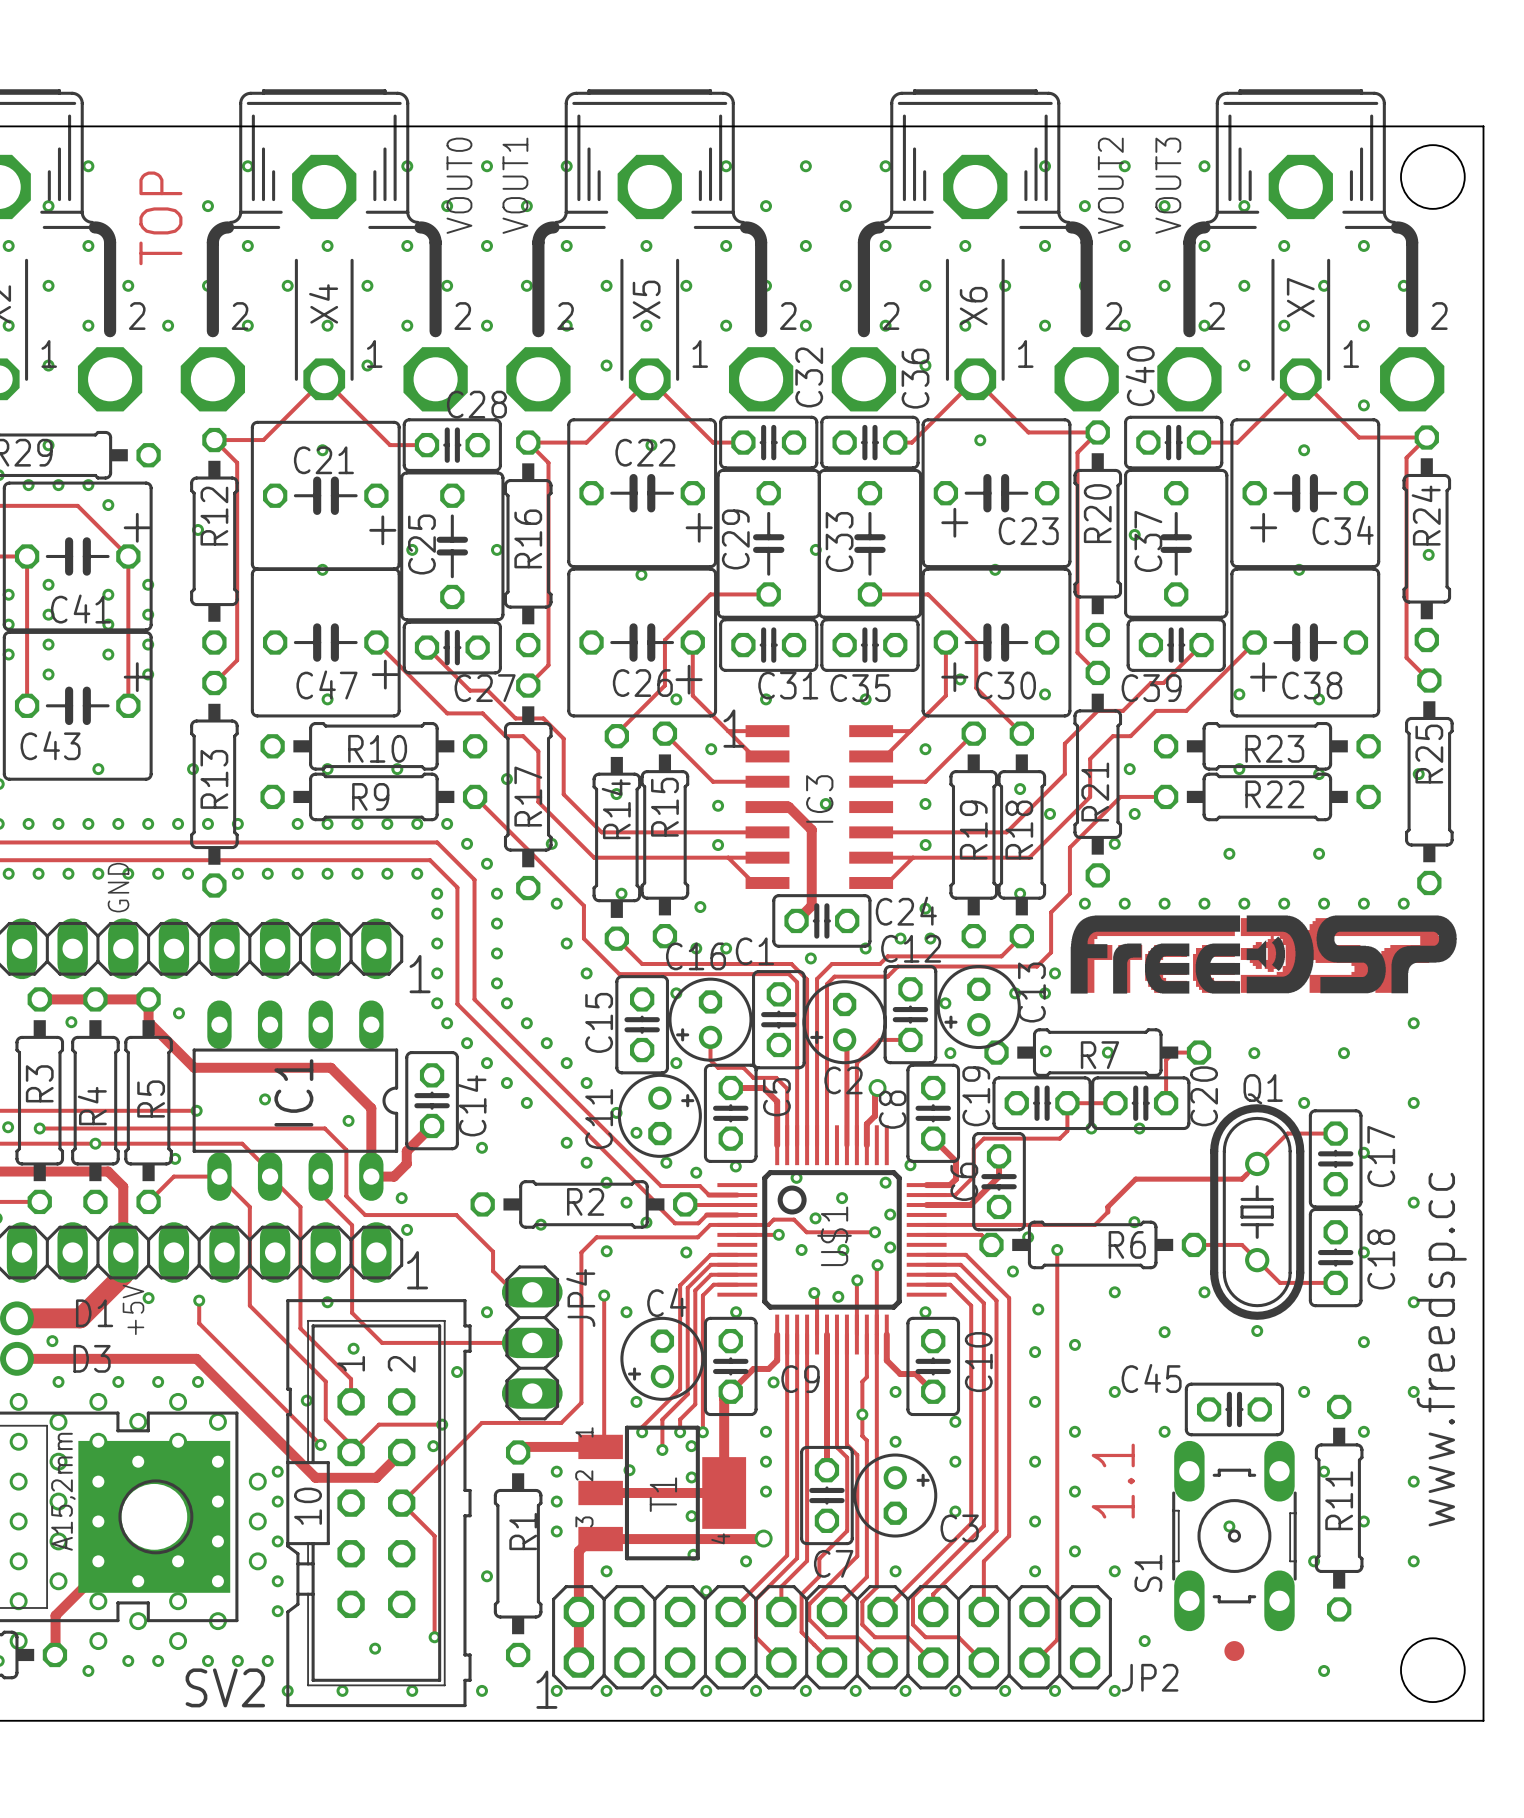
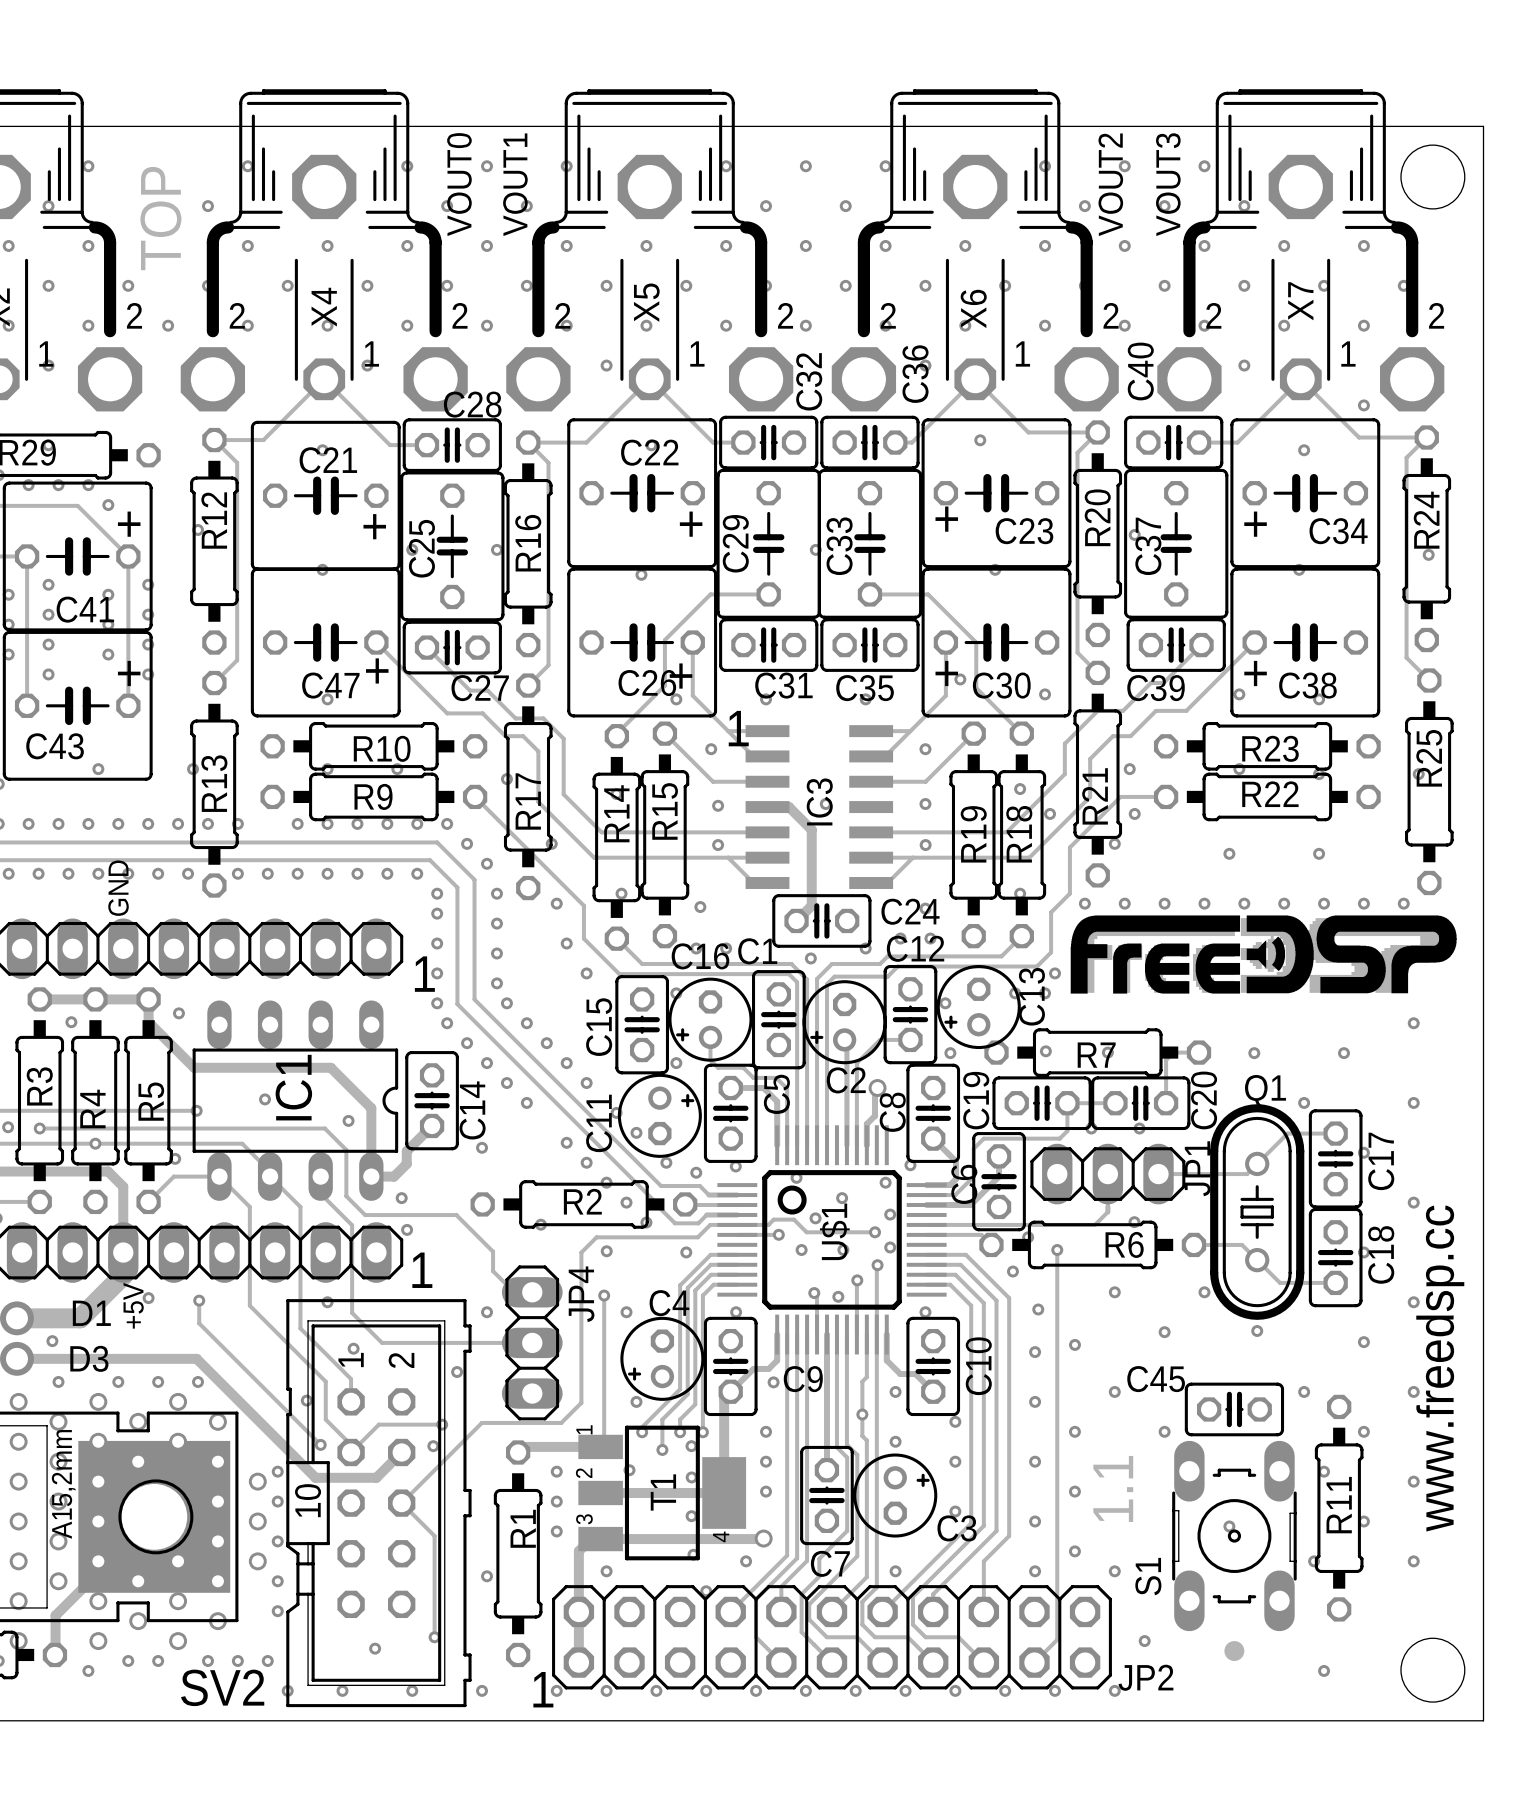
JP1: none -> (1107, 1174)
track: (1247, 1174) (1242, 1179) (1135, 1179) (1107, 1206) -> (1247, 1174) (1158, 1174)

